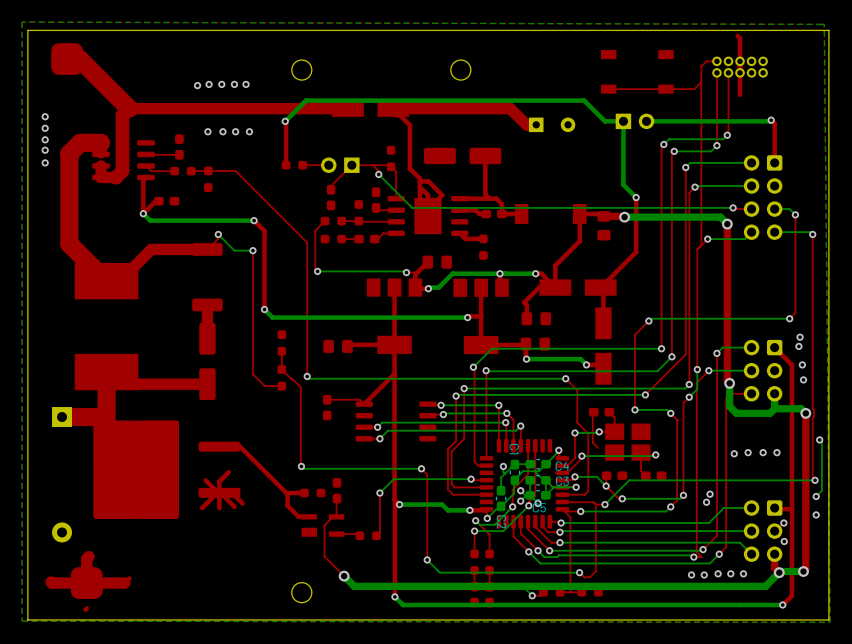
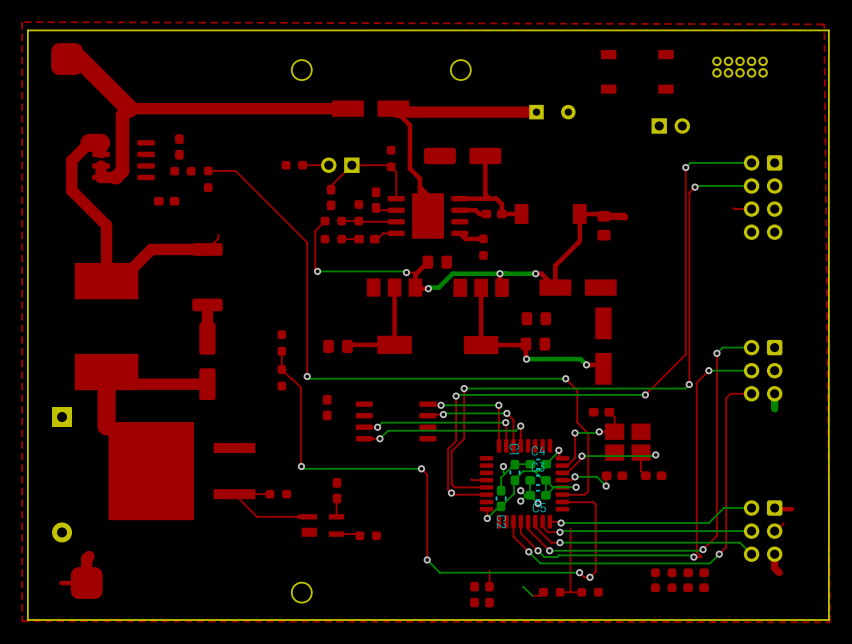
bottom zone outline: (22, 22) (824, 24) (830, 622) (22, 621) (22, 22) -> none
top track: (737, 35) (740, 38) (740, 94) -> none
top track: (716, 61) (706, 61) (701, 66) (701, 245) -> none
top track: (716, 72) (716, 145) -> none
top track: (728, 72) (727, 135) -> none
top track: (701, 82) (694, 89) (608, 89) -> none
via: (209, 84) -> none
via: (221, 84) -> none
via: (234, 84) -> none
via: (246, 84) -> none
via: (197, 85) -> none
top track: (393, 108) (510, 108) (526, 124) (536, 124) -> none
top track: none -> (536, 112) (396, 112)
via: (45, 116) -> none
top track: (771, 120) (774, 123) (774, 162) (772, 160) -> none
bottom track: (771, 120) (646, 121) -> none
via: (771, 120) -> none
top track: (285, 121) (286, 165) -> none
bottom track: (285, 121) (306, 100) (584, 100) (604, 121) (623, 121) (623, 184) (636, 197) -> none
via: (285, 121) -> none
part position: (634, 121) -> (670, 125)
part position: (552, 124) -> (552, 112)
via: (45, 128) -> none
via: (207, 131) -> none
via: (222, 131) -> none
via: (235, 131) -> none
via: (249, 131) -> none
bottom track: (727, 135) (723, 139) (669, 139) (663, 144) -> none
via: (727, 135) -> none
via: (45, 139) -> none
top track: (89, 142) (80, 142) (69, 153) (69, 244) (106, 281) -> (89, 142) (71, 160) (71, 190) (106, 225) (106, 281)
top track: (663, 144) (661, 146) (661, 348) -> none
via: (663, 144) -> none
bottom track: (716, 145) (711, 151) (674, 151) -> none
via: (716, 145) -> none
via: (45, 150) -> none
top track: (674, 151) (671, 153) (671, 356) -> none
via: (674, 151) -> none
top track: (146, 154) (179, 154) -> none
via: (45, 162) -> none
top track: (146, 165) (151, 171) (174, 171) -> none
top track: (372, 165) (378, 171) (378, 174) -> none
top track: (208, 170) (191, 171) -> none
bottom track: (378, 174) (412, 207) (733, 207) -> none
via: (378, 174) -> none
top track: (146, 177) (143, 180) (143, 213) (155, 201) (158, 201) -> none
top track: (419, 181) (428, 181) (442, 195) (428, 209) -> none
part footprint: [387, 195, 469, 237] -> [387, 193, 469, 239]
top track: (636, 197) (636, 252) (600, 287) (603, 290) (603, 323) -> none
via: (636, 197) -> none
via: (733, 207) -> none
bottom track: (774, 209) (789, 209) (795, 214) -> none
bottom track: (143, 213) (150, 220) (254, 220) -> none
via: (143, 213) -> none
top track: (795, 214) (795, 312) (789, 318) -> none
via: (795, 214) -> none
bottom track: (624, 217) (720, 217) (727, 224) -> none
via: (624, 217) -> none
top track: (254, 220) (264, 231) (264, 309) -> none
via: (254, 220) -> none
top track: (727, 224) (727, 381) (729, 383) -> none
via: (727, 224) -> none
bottom track: (751, 232) (744, 239) (707, 239) -> none
bottom track: (774, 232) (810, 232) (812, 234) -> none
bottom track: (218, 234) (234, 250) (252, 250) -> none
via: (218, 234) -> none
top track: (812, 234) (812, 478) (815, 480) -> none
via: (812, 234) -> none
top track: (707, 239) (697, 249) (697, 369) -> none
via: (707, 239) -> none
top track: (252, 250) (252, 374) (264, 386) (281, 386) -> none
via: (252, 250) -> none
top track: (549, 287) (539, 287) (524, 302) (526, 305) (526, 318) -> none
bottom track: (264, 309) (272, 317) (467, 317) -> none
via: (264, 309) -> none
top track: (481, 316) (467, 317) -> none
via: (467, 317) -> none
bottom track: (789, 318) (651, 318) (648, 321) -> none
via: (789, 318) -> none
top track: (648, 321) (634, 334) (634, 409) -> none
via: (648, 321) -> none
via: (800, 337) -> none
top track: (394, 344) (394, 499) (399, 504) -> none
via: (798, 346) -> none
top track: (774, 347) (791, 364) (791, 595) (782, 604) -> none
bottom track: (661, 348) (491, 348) (473, 367) -> none
via: (661, 348) -> none
bottom track: (671, 356) (657, 371) (486, 370) -> none
via: (671, 356) -> none
via: (802, 364) -> none
top track: (473, 367) (474, 461) (478, 465) (486, 465) -> none
via: (473, 367) -> none
bottom track: (697, 369) (697, 389) (689, 397) -> none
via: (697, 369) -> none
top track: (486, 370) (486, 458) -> none
via: (486, 370) -> none
top track: (394, 373) (364, 404) (359, 399) (327, 399) -> none
via: (803, 379) -> none
bottom track: (729, 383) (729, 406) (736, 413) (770, 413) (774, 408) (801, 408) (805, 413) -> none
via: (729, 383) -> none
top track: (689, 397) (683, 403) (683, 495) -> none
via: (689, 397) -> none
bottom track: (634, 409) (667, 409) (670, 413) -> none
via: (634, 409) -> none
top track: (593, 412) (592, 442) (598, 448) -> none
top track: (670, 413) (677, 420) (677, 500) (670, 506) -> none
via: (670, 413) -> none
top track: (805, 413) (805, 569) (803, 571) -> none
via: (805, 413) -> none
top track: (97, 417) (62, 417) -> none
bottom track: (819, 439) (821, 442) (821, 490) (816, 496) -> none
via: (819, 439) -> none
top track: (237, 444) (287, 494) -> none
top track: (528, 445) (528, 474) (512, 489) (512, 506) -> none
top track: (535, 445) (535, 495) (528, 502) (528, 505) -> none
via: (748, 452) -> none
via: (763, 452) -> none
via: (776, 452) -> none
via: (734, 453) -> none
C4 name position: C4 (562, 466) -> C4 (538, 450)
part: (166, 469) -> none
part: none -> (181, 471)
top track: (228, 472) (219, 481) (219, 507) -> none
bottom track: (471, 479) (393, 479) (379, 493) -> none
via: (471, 479) -> none
top track: (205, 480) (218, 492) -> none
bottom track: (815, 480) (629, 480) (604, 504) -> none
via: (815, 480) -> none
C3 name position: C3 (562, 481) -> C3 (538, 467)
top track: (606, 486) (618, 498) (622, 498) -> none
top track: (220, 492) (234, 506) -> none
top track: (304, 493) (287, 494) -> none
part position: (312, 493) -> (278, 494)
top track: (379, 493) (379, 532) (376, 535) -> none
via: (379, 493) -> none
via: none -> (451, 493)
top track: (287, 494) (287, 505) (298, 516) -> (270, 494) (234, 494) (257, 516) (298, 516)
via: (710, 494) -> none
bottom track: (683, 495) (680, 498) (622, 498) -> none
via: (683, 495) -> none
via: (816, 496) -> none
via: (622, 498) -> none
top track: (394, 499) (394, 596) -> none
via: (706, 502) -> none
top track: (242, 503) (232, 492) (217, 492) (202, 508) -> none
bottom track: (399, 504) (442, 504) (448, 510) (469, 510) -> none
via: (399, 504) -> none
top track: (604, 504) (595, 504) -> none
via: (604, 504) -> none
bottom track: (528, 505) (503, 531) (474, 531) -> none
via: (528, 505) -> none
bottom track: (512, 506) (494, 524) (479, 524) (475, 520) -> none
via: (512, 506) -> none
bottom track: (670, 506) (666, 511) (580, 511) -> none
via: (670, 506) -> none
top track: (486, 509) (469, 510) -> none
top track: (562, 509) (570, 517) (570, 528) -> none
via: (469, 510) -> none
top track: (580, 511) (564, 511) -> none
via: (580, 511) -> none
via: (816, 514) -> none
top track: (336, 516) (333, 516) (324, 525) (324, 556) (344, 576) -> none
top track: (475, 520) (489, 534) (489, 553) -> none
via: (475, 520) -> none
via: (783, 523) -> none
top track: (474, 531) (474, 553) -> none
via: (474, 531) -> none
via: (784, 541) -> none
part: (474, 562) -> none
part: (489, 562) -> none
top track: (474, 570) (474, 586) -> none
bottom track: (803, 571) (780, 571) (765, 586) (354, 586) (344, 576) -> none
via: (803, 571) -> none
part: none -> (663, 572)
part: none -> (696, 572)
via: (779, 572) -> none
via: (718, 573) -> none
via: (730, 573) -> none
via: (743, 573) -> none
via: (691, 574) -> none
via: (704, 574) -> none
via: (344, 576) -> none
via: none -> (589, 577)
top track: (129, 578) (124, 583) (50, 581) -> none
part: none -> (663, 587)
part: none -> (696, 587)
via: (532, 595) -> none
bottom track: (394, 596) (403, 604) (782, 604) -> none
via: (394, 596) -> none
via: (782, 604) -> none
top track: (86, 608) (85, 609) -> none

